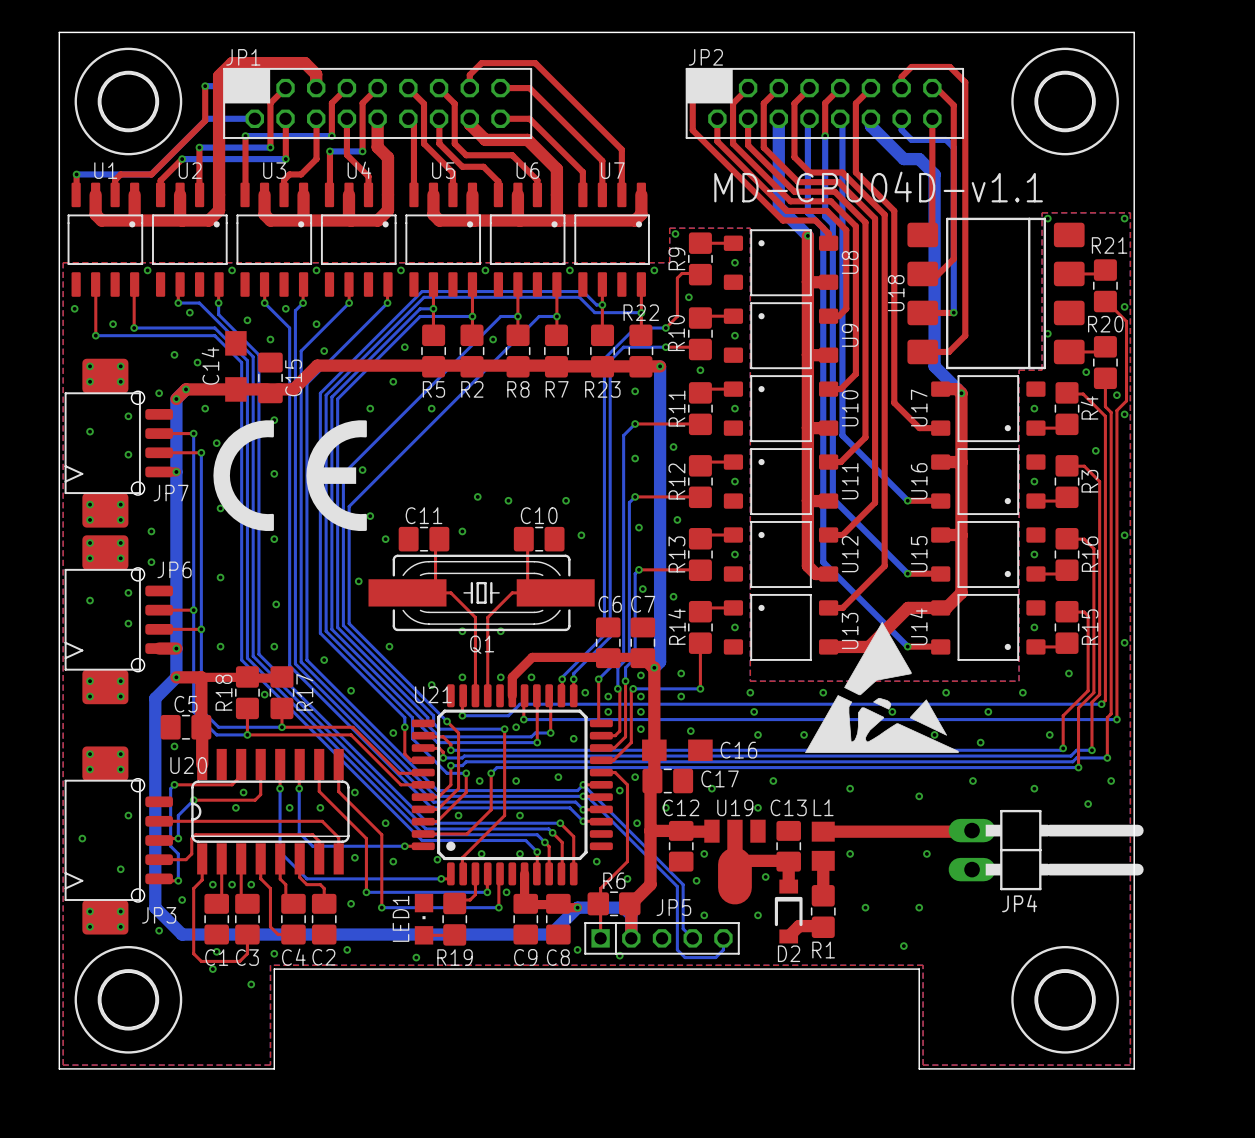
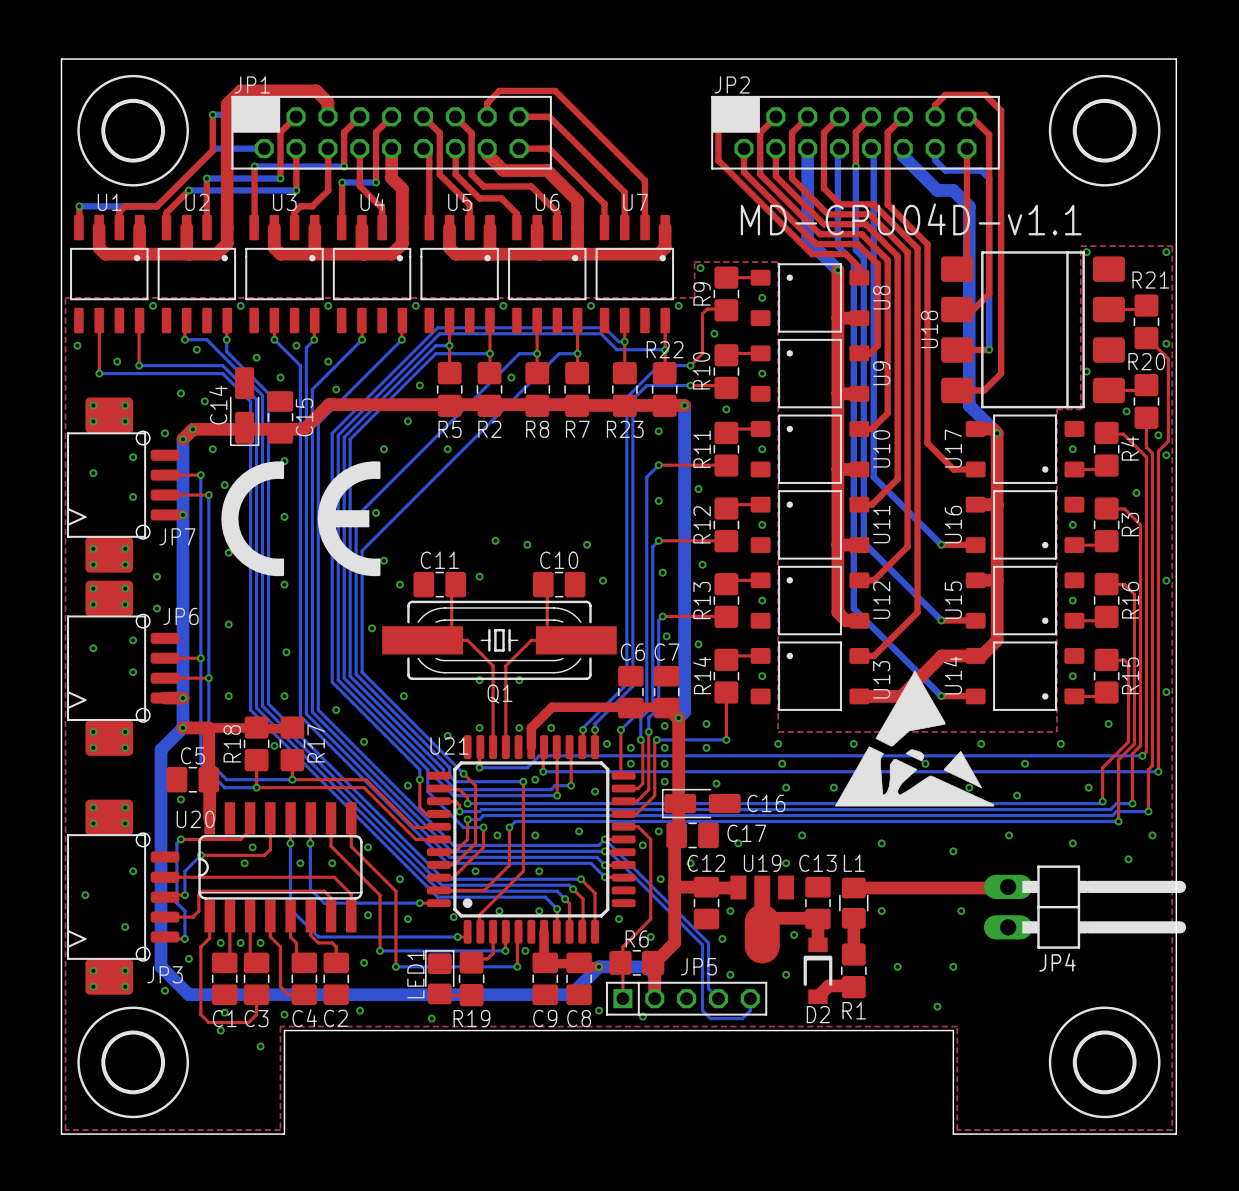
C14 footprint: [225, 331, 247, 402] -> [229, 367, 260, 447]
C16 footprint: [642, 739, 713, 762] -> [661, 788, 741, 819]
L1 footprint: [811, 821, 835, 871] -> [839, 877, 869, 929]
LED1 footprint: [414, 893, 434, 945] -> [425, 950, 455, 1005]

